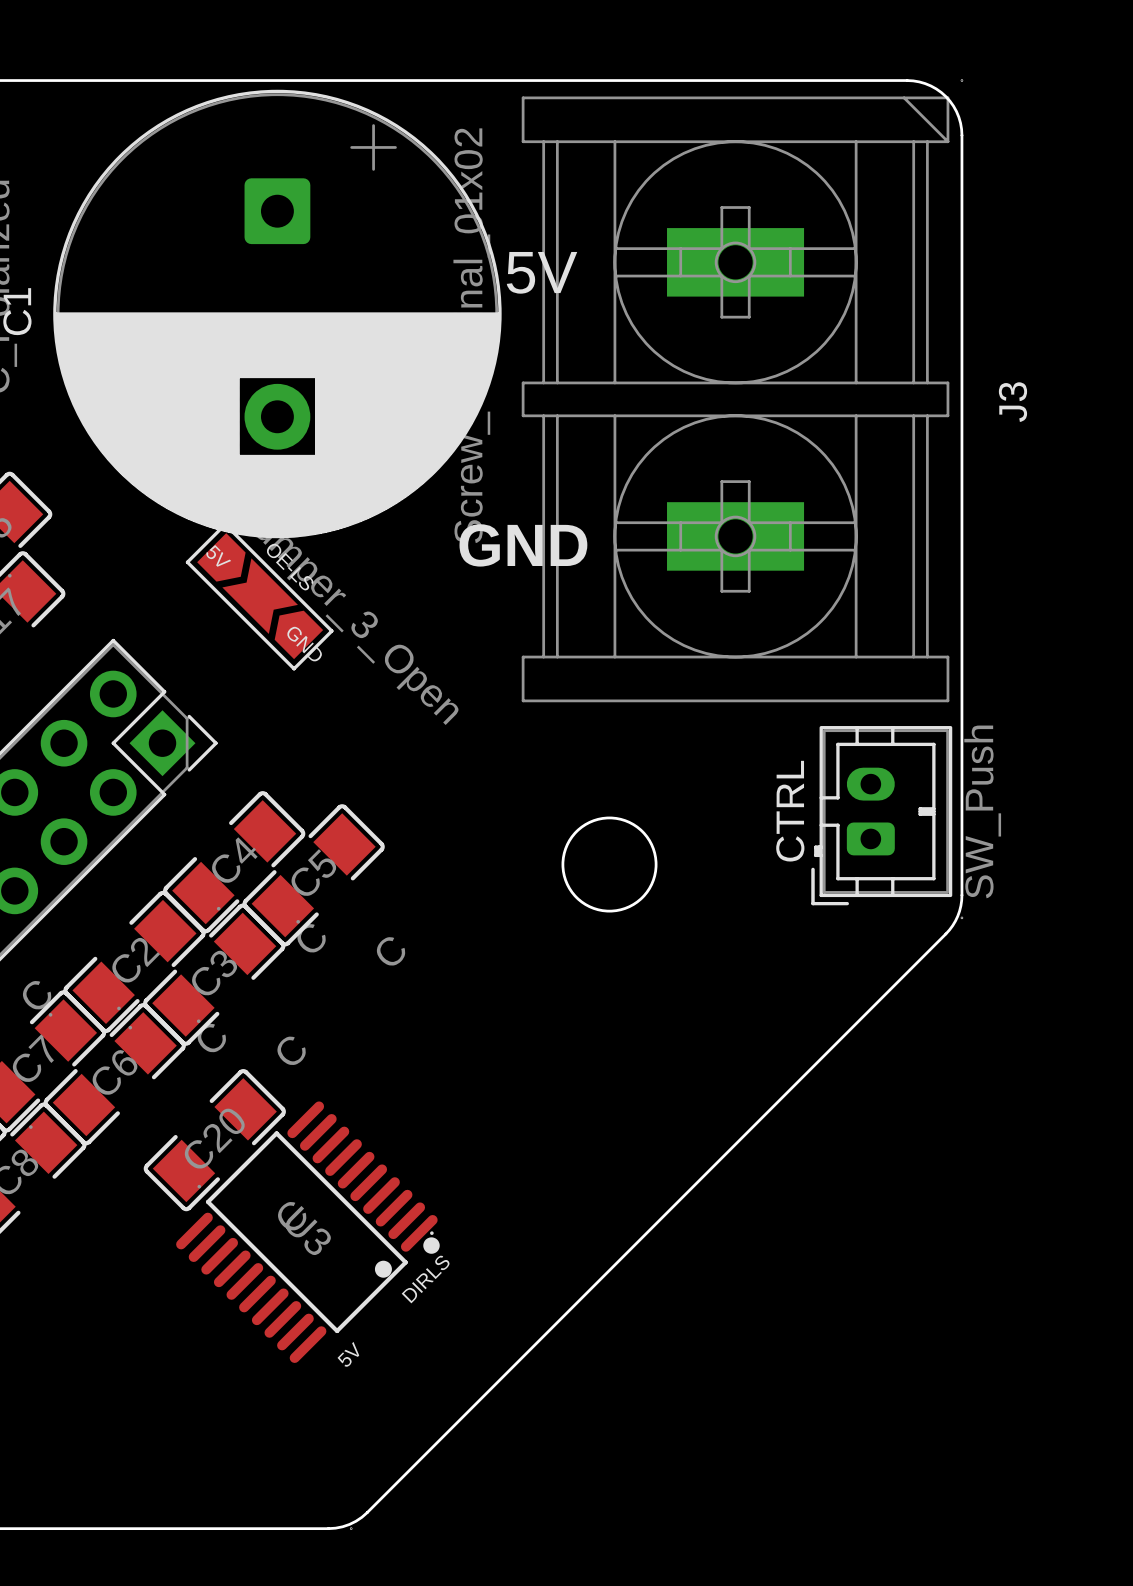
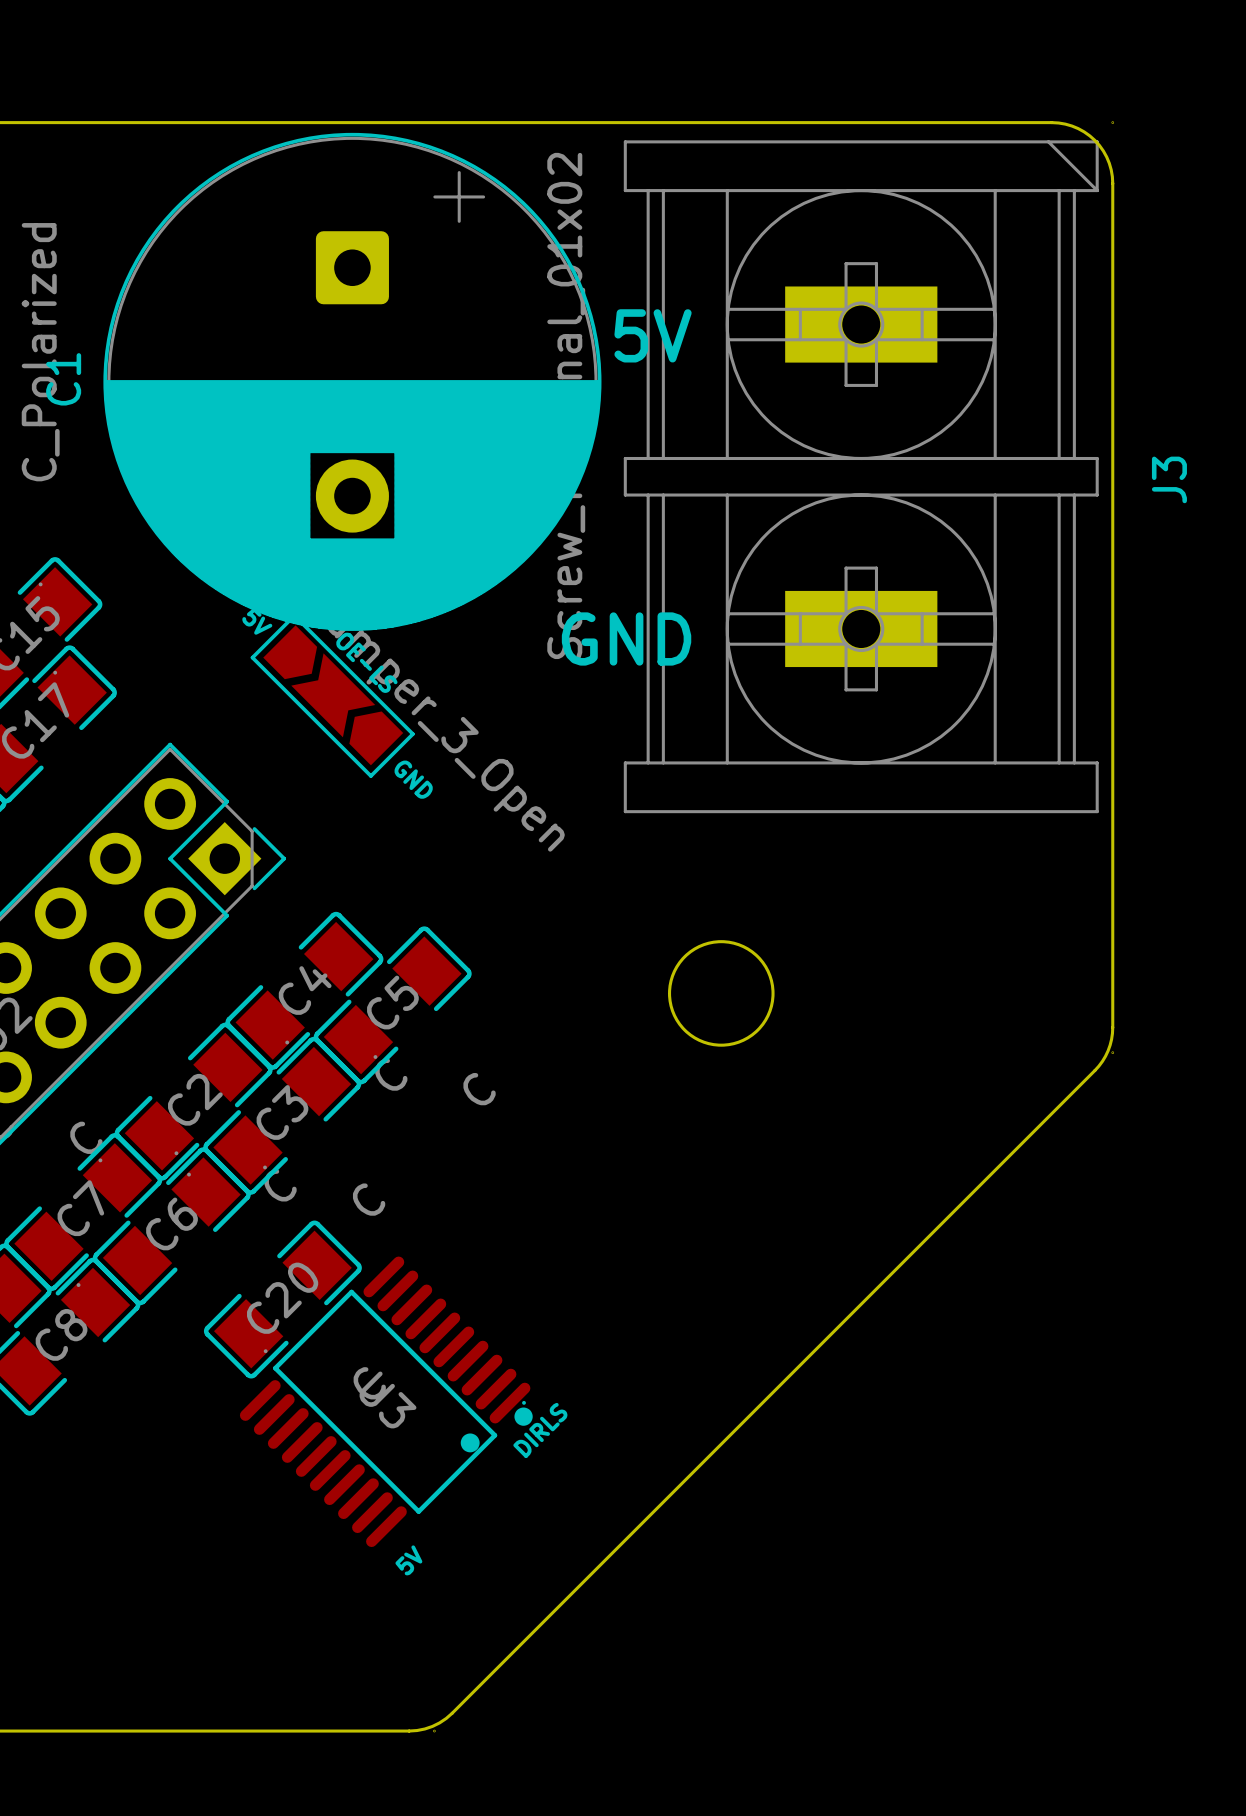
CTRL: SW_Push (881, 815) -> none

